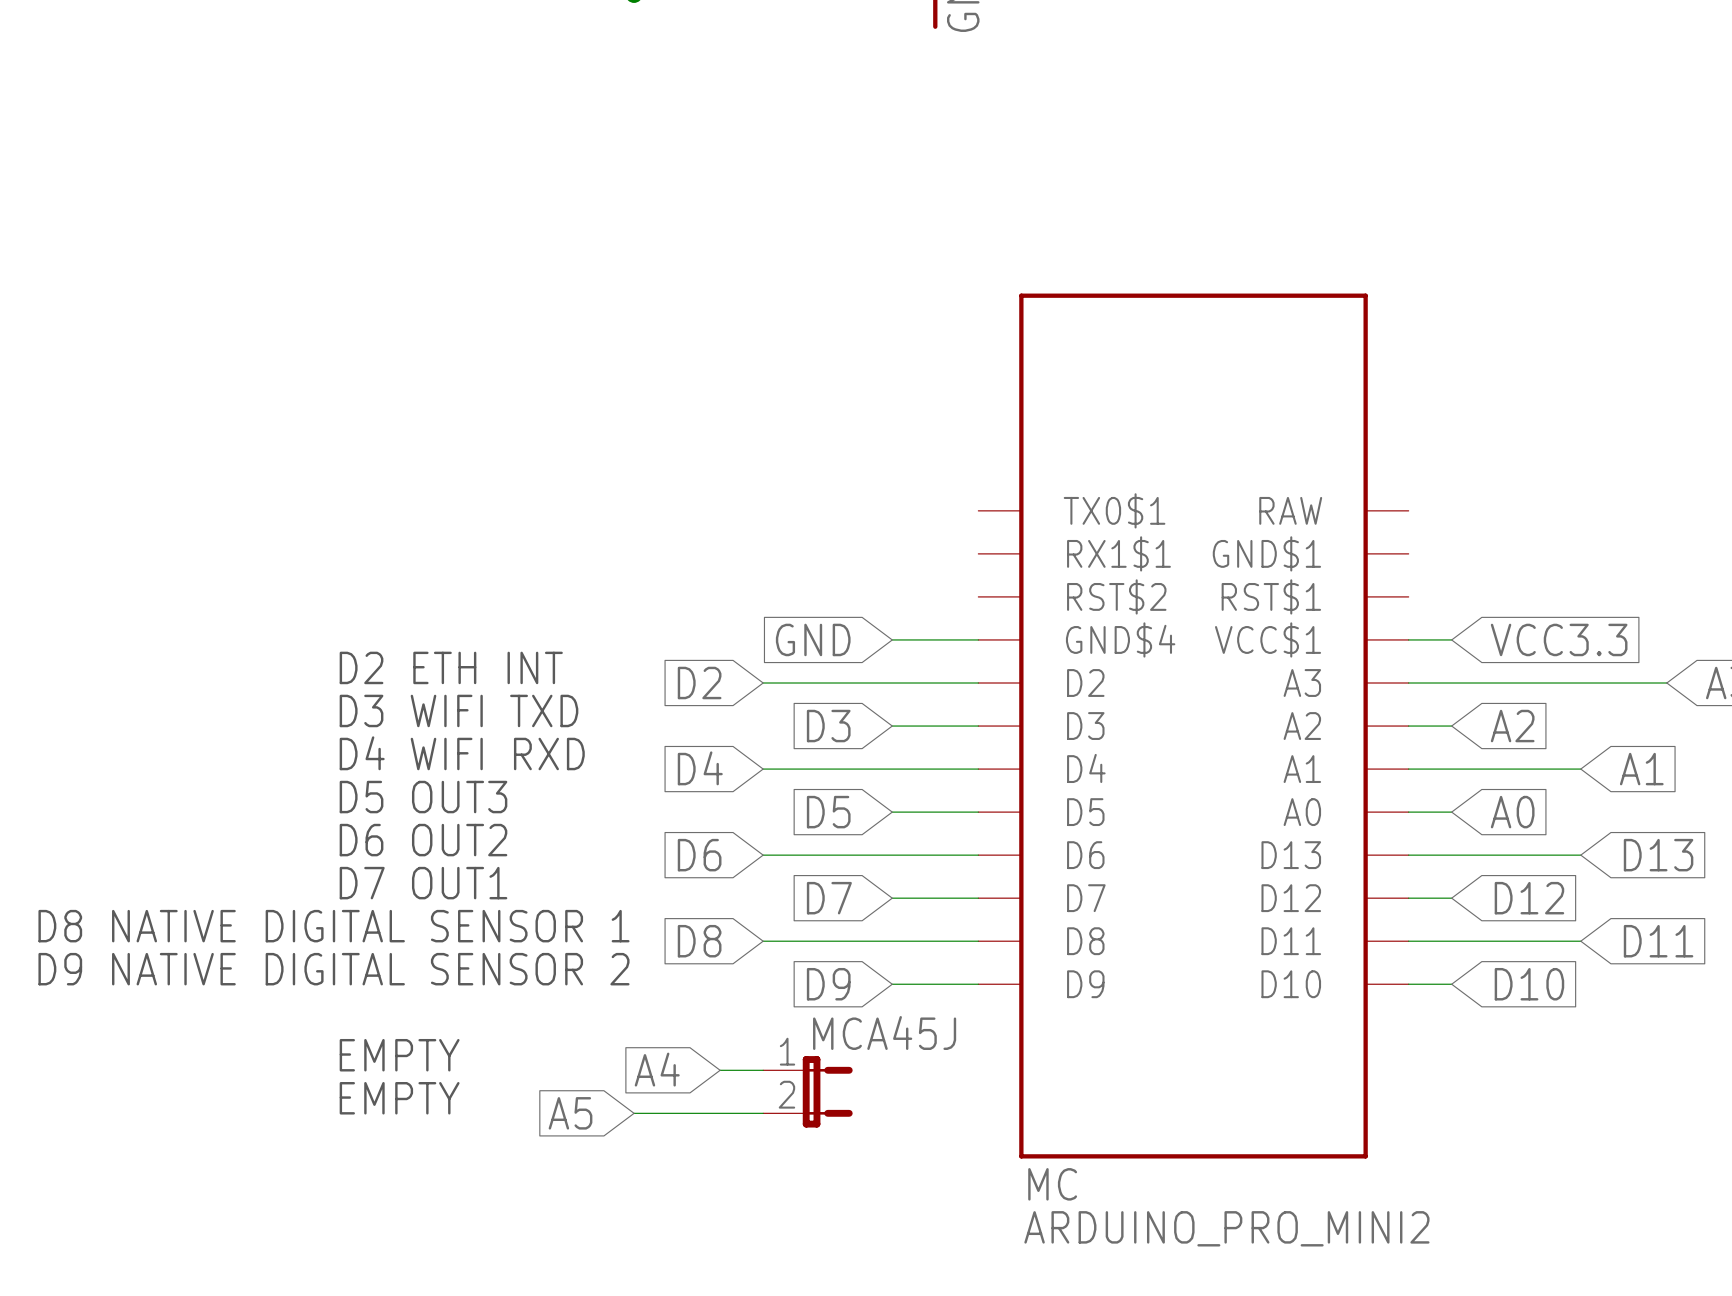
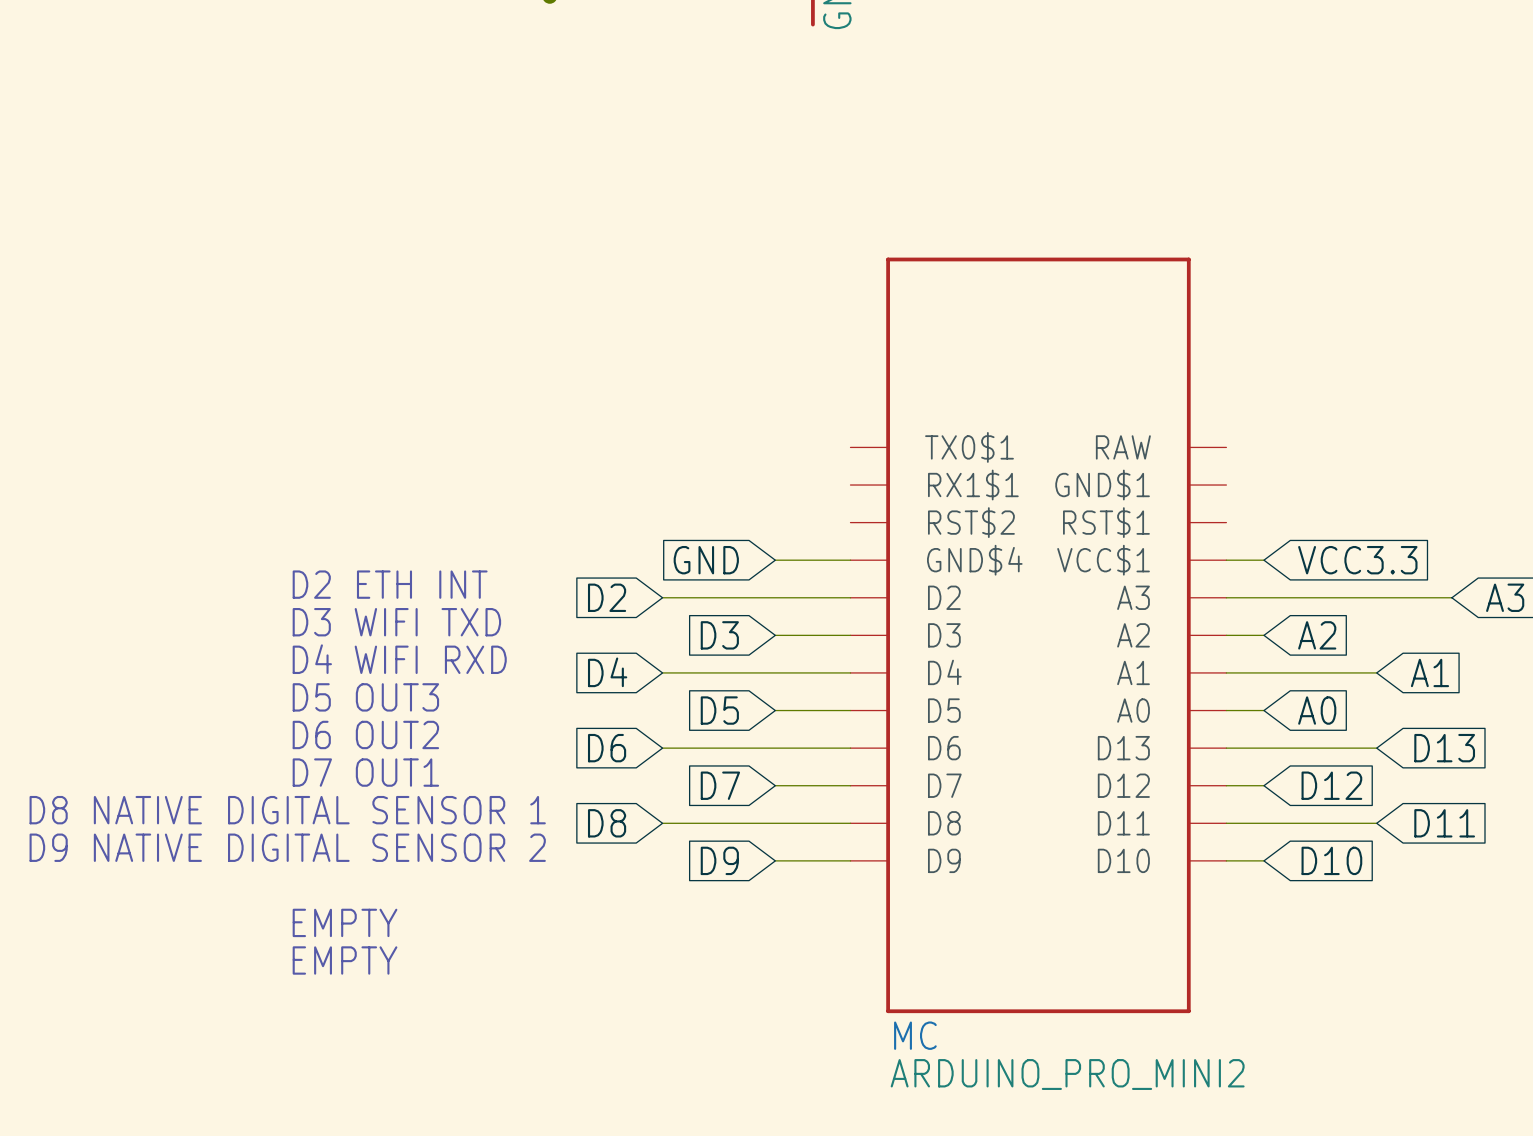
global label: A4 (657, 1069) -> none
wire: (720, 1070) (763, 1070) -> none
MCA45J: (807, 1091) -> none
global label: A5 (570, 1113) -> none
wire: (634, 1113) (763, 1113) -> none

